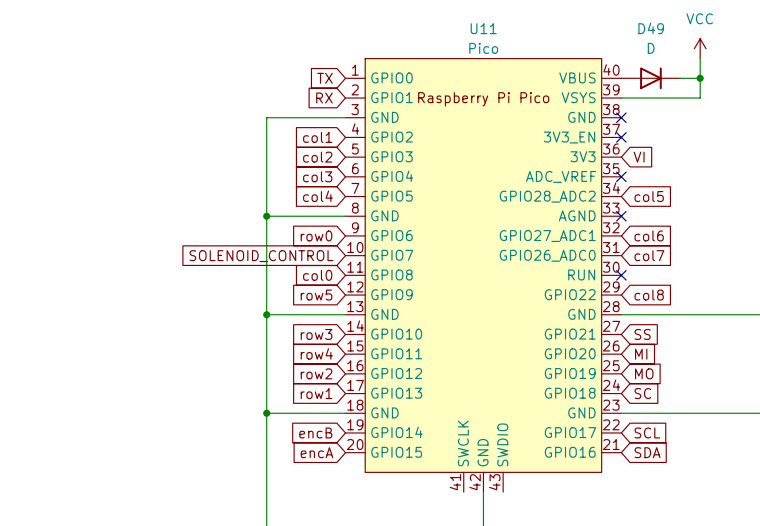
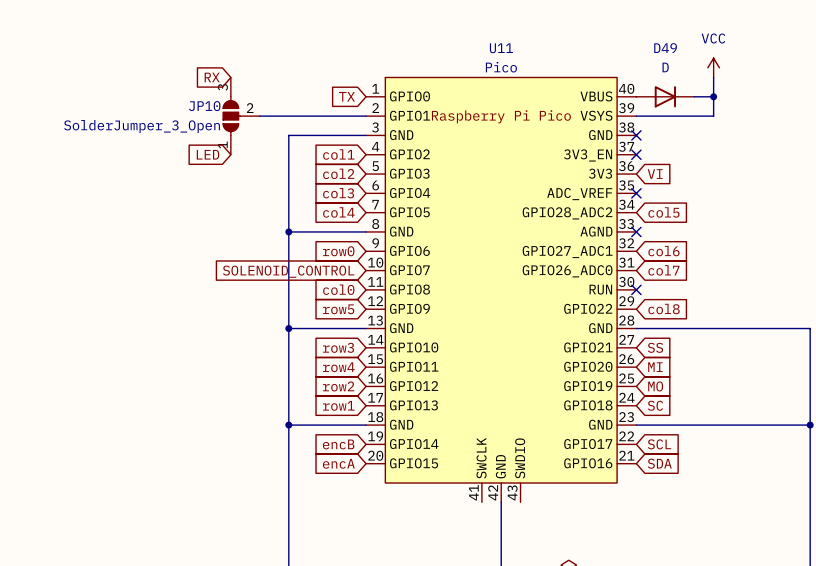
JP10: none -> SolderJumper_3_Open (241, 116)
wire: none -> (259, 116) (366, 116)
global label position: RX (324, 98) -> RX (212, 77)
global label: none -> LED (208, 154)

